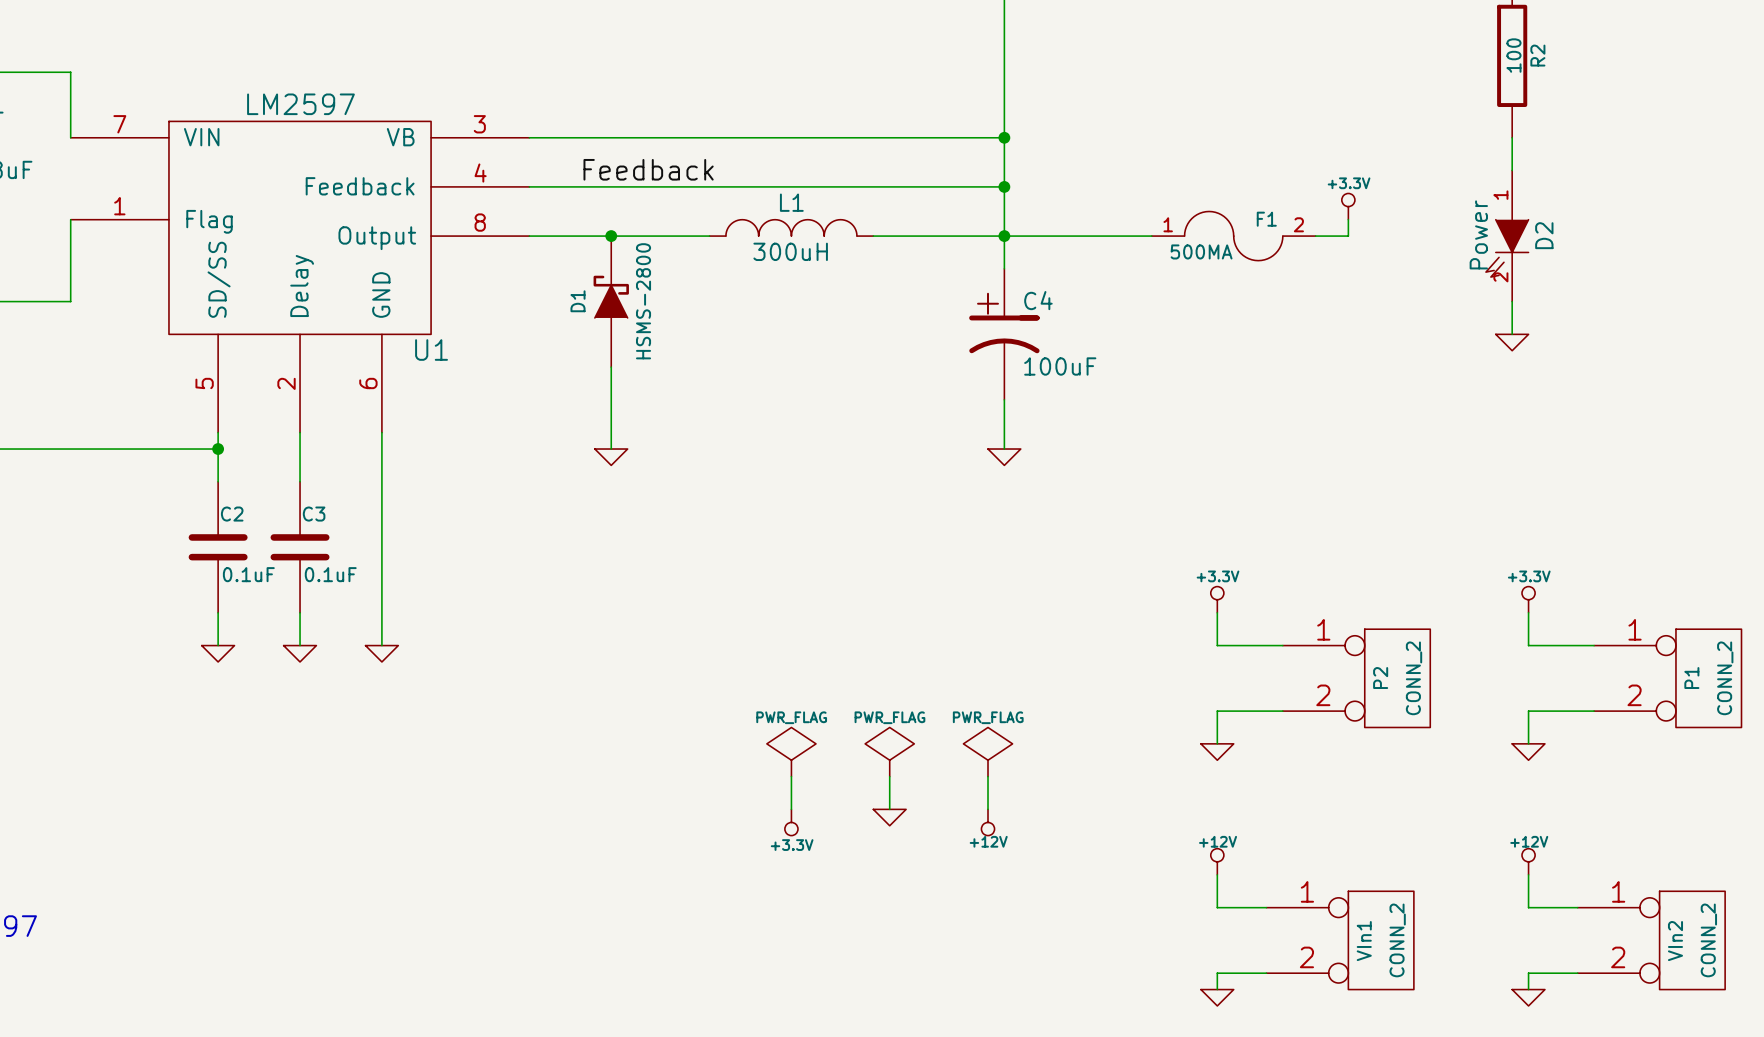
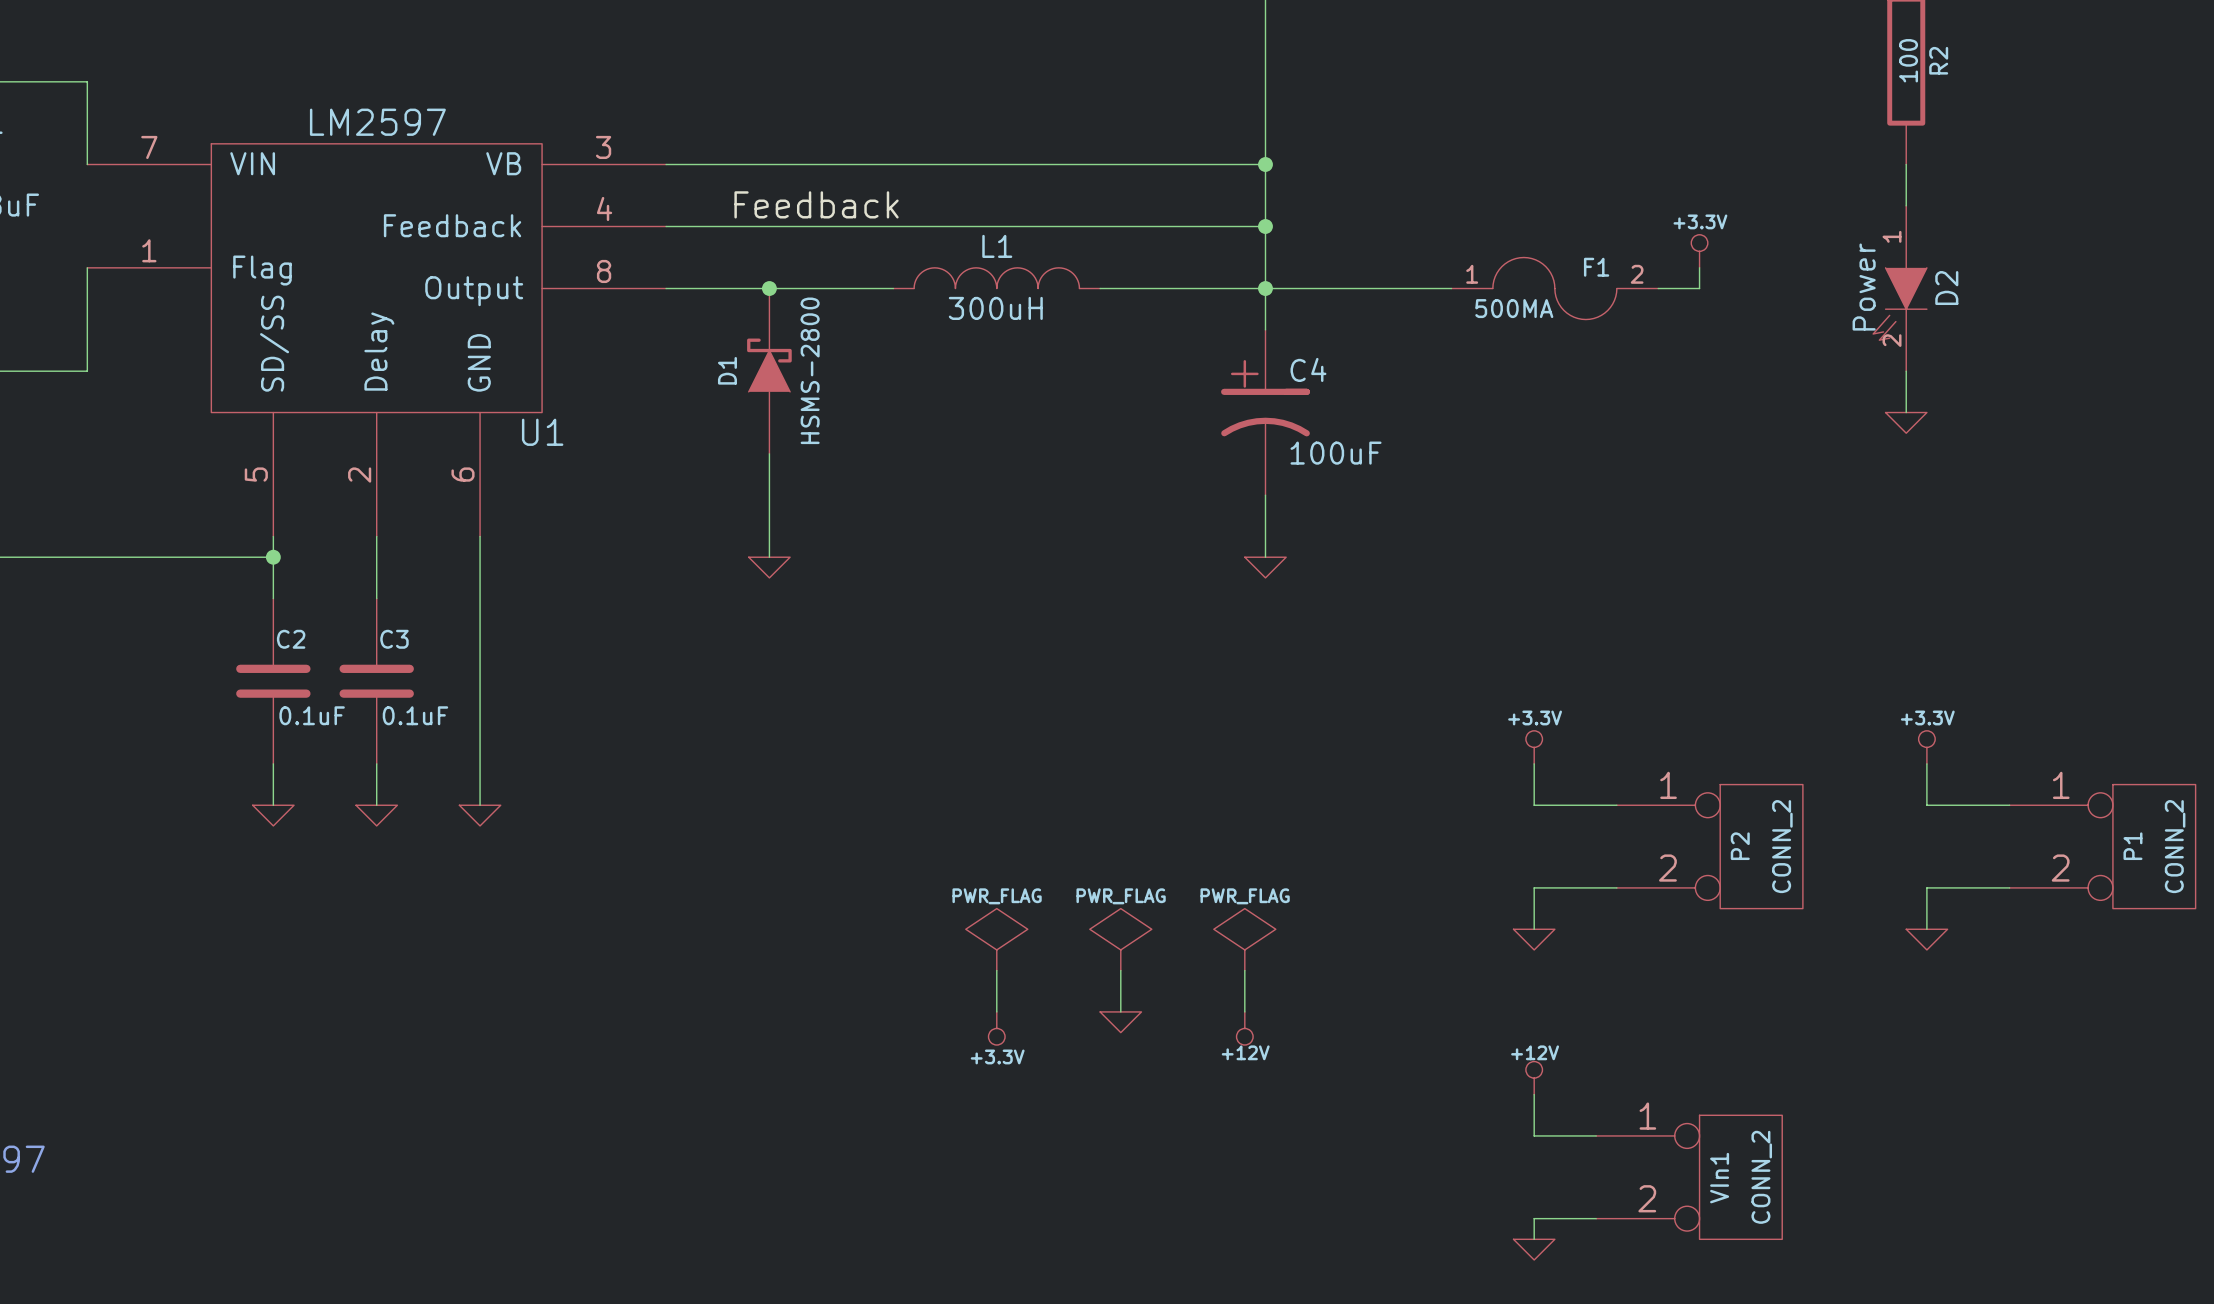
power symbol: +12V (1528, 861) -> none
wire: (1528, 874) (1528, 907) (1577, 907) -> none
VIn2: CONN_2 (1651, 940) -> none
wire: (1577, 973) (1528, 973) (1528, 989) -> none
power symbol: (1528, 997) -> none

